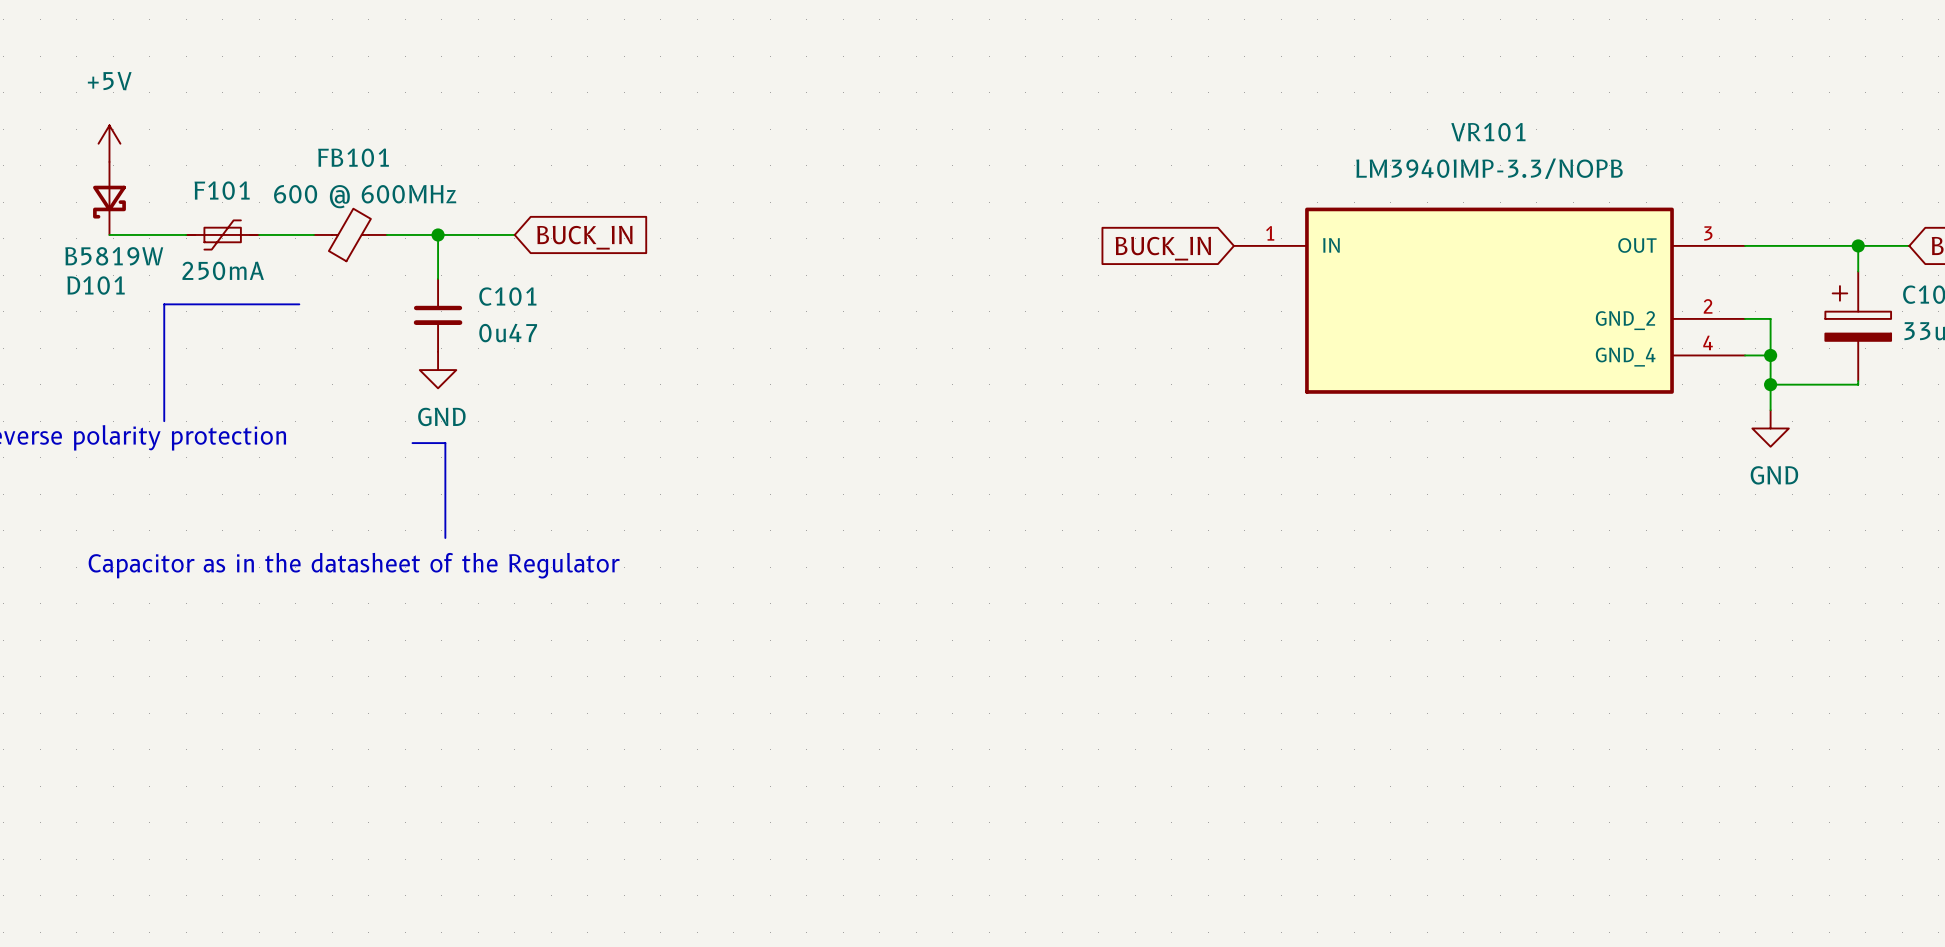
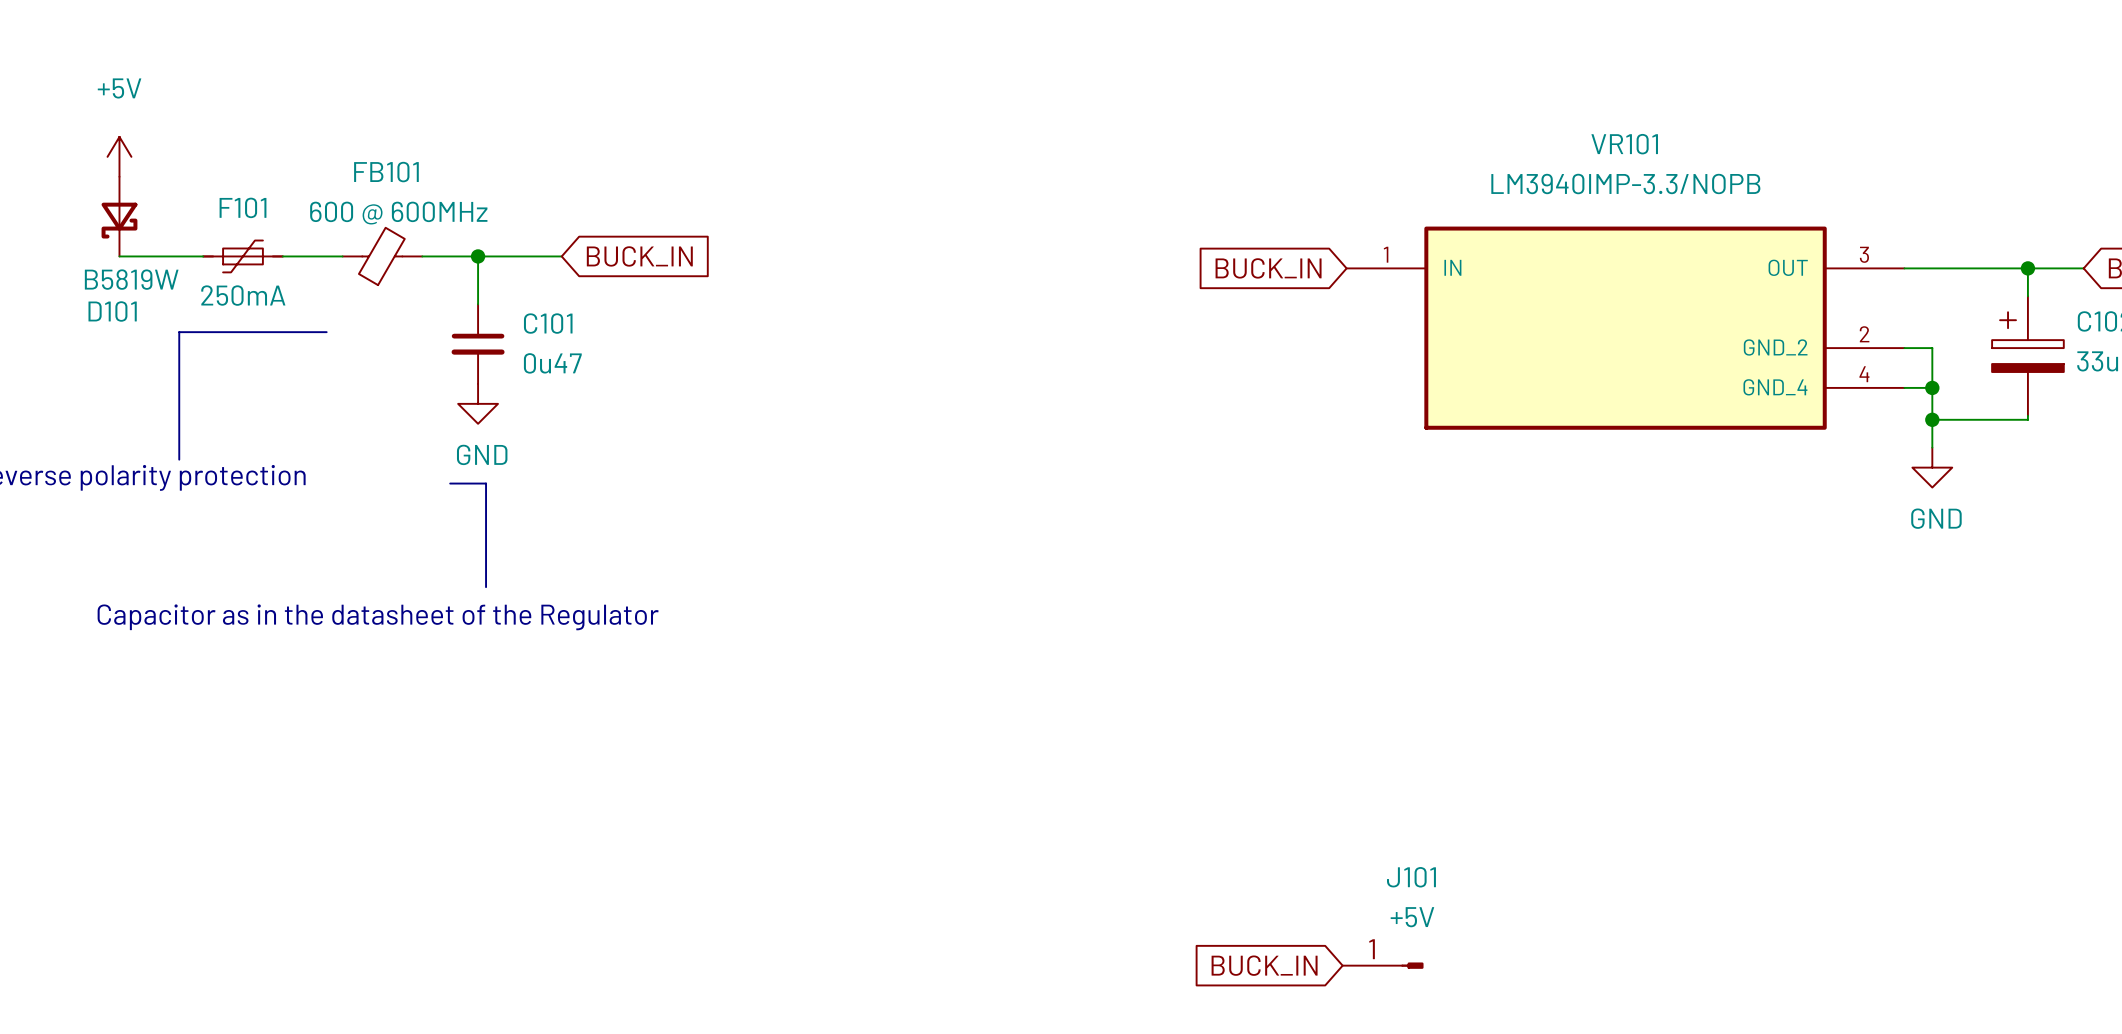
J101: none -> +5V (1383, 965)
global label: none -> BUCK_IN (1264, 965)

